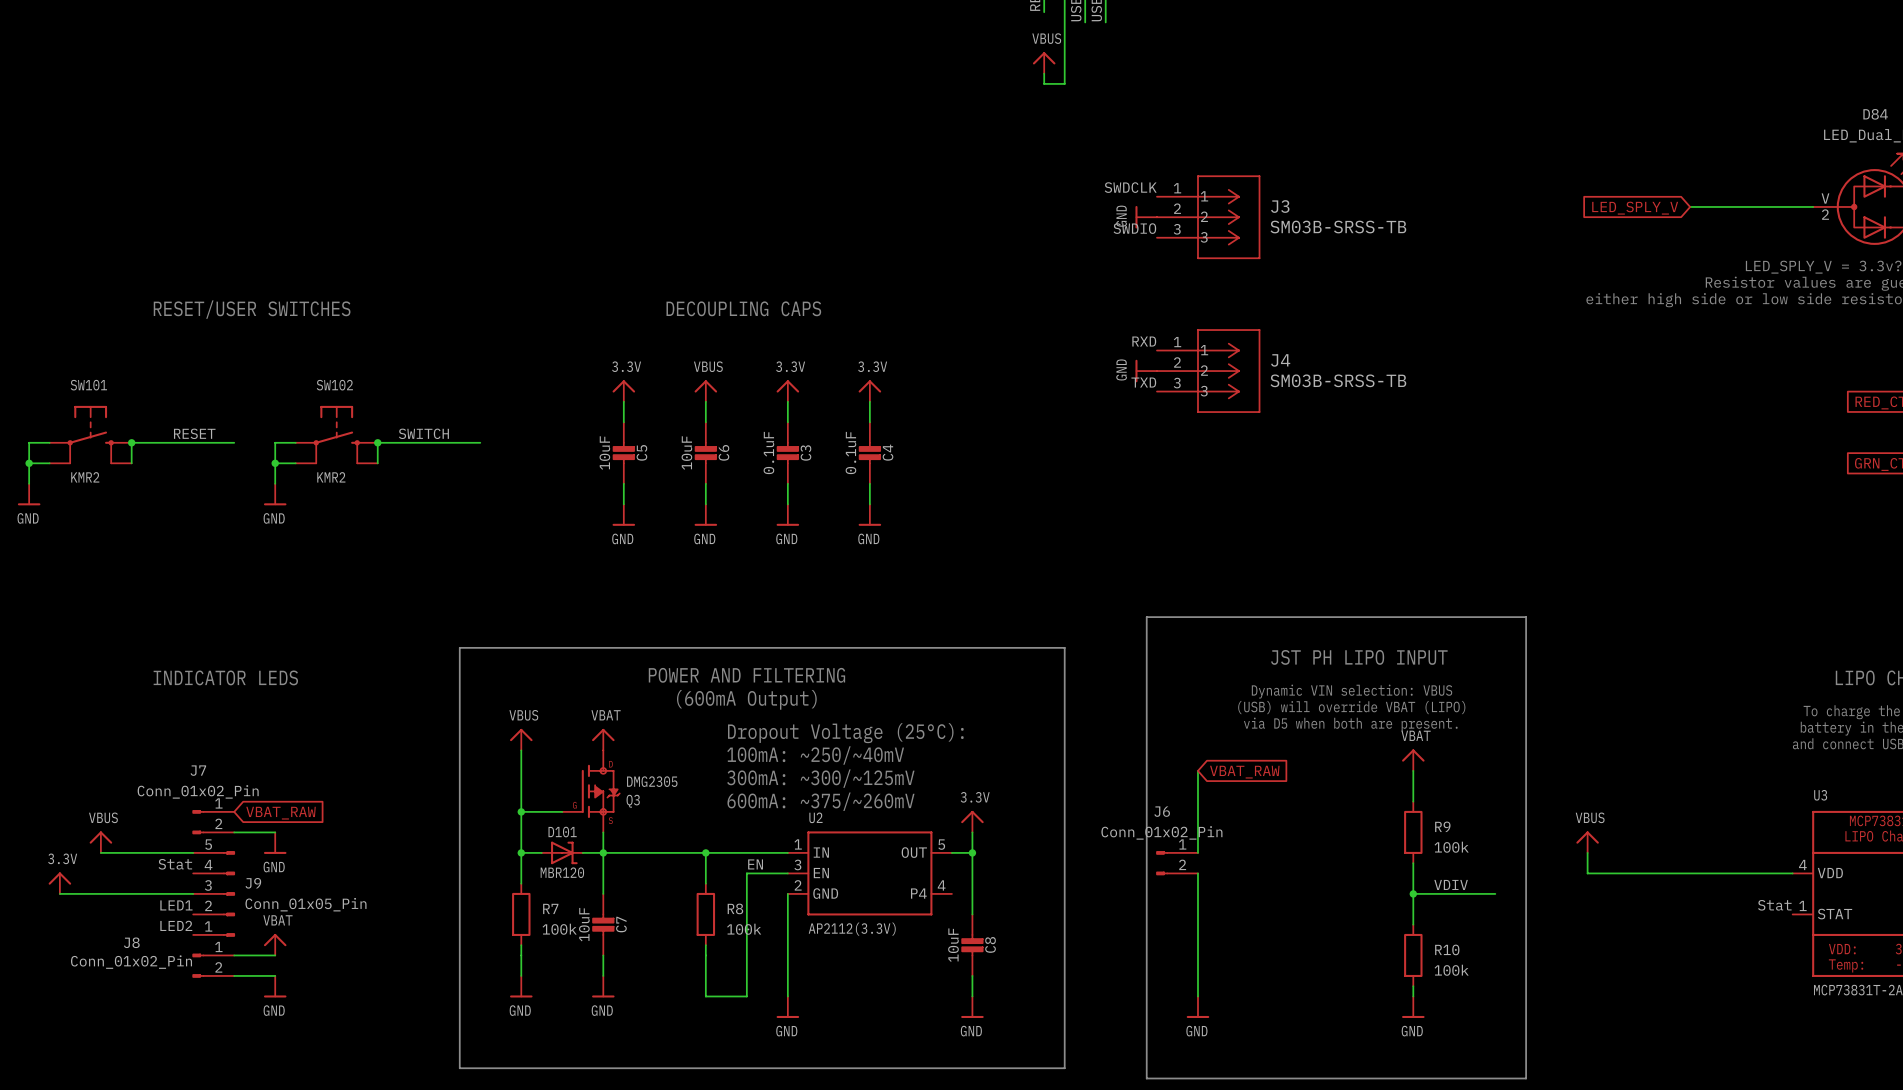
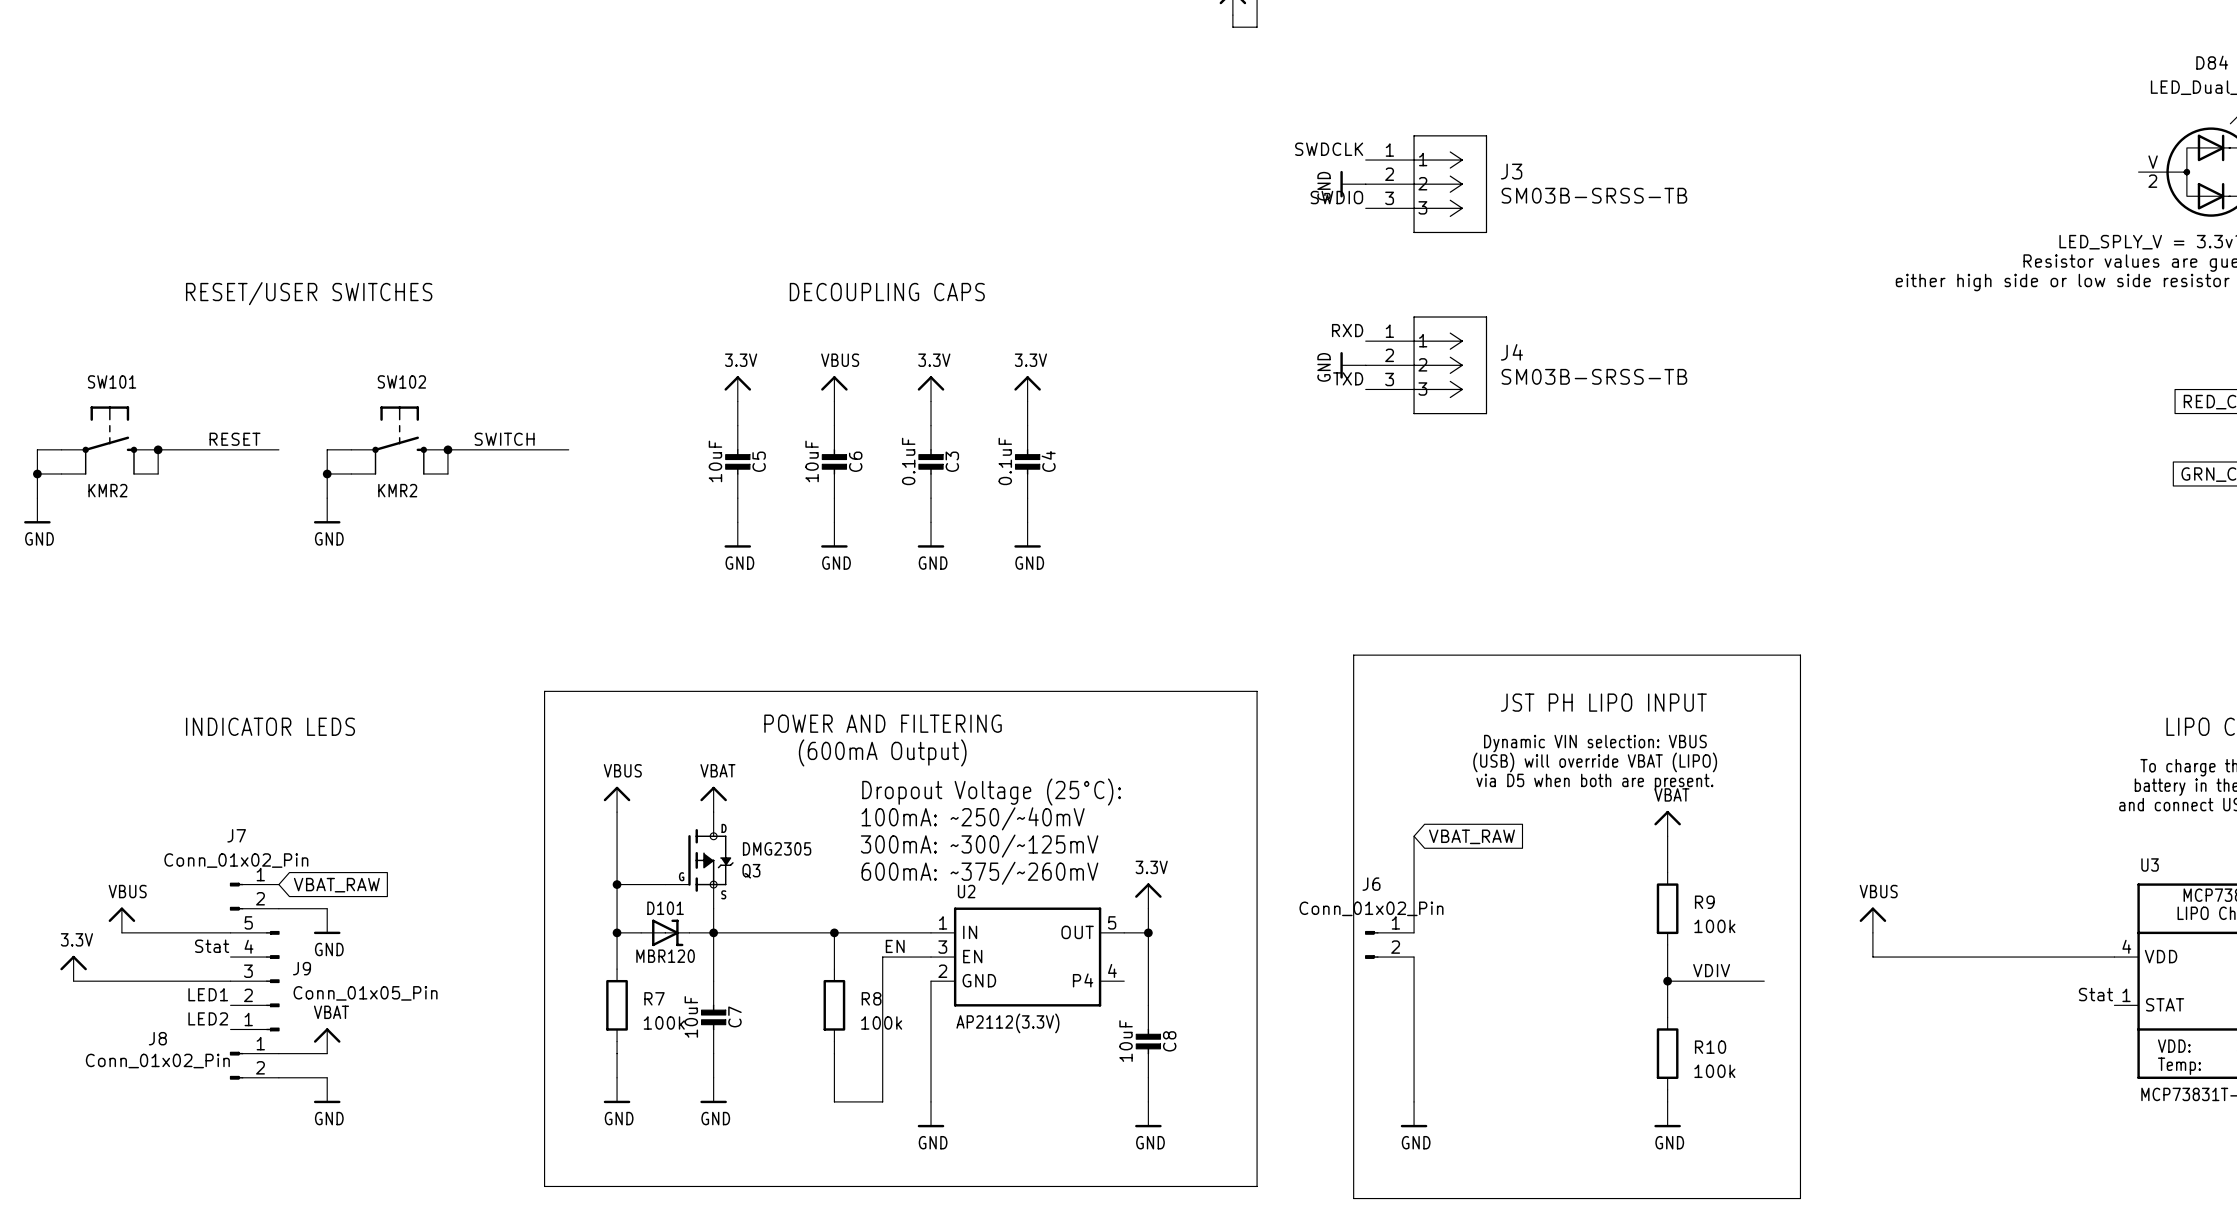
wire: (1690, 206) (1813, 206) -> none
global label: LED_SPLY_V (1635, 208) -> none

